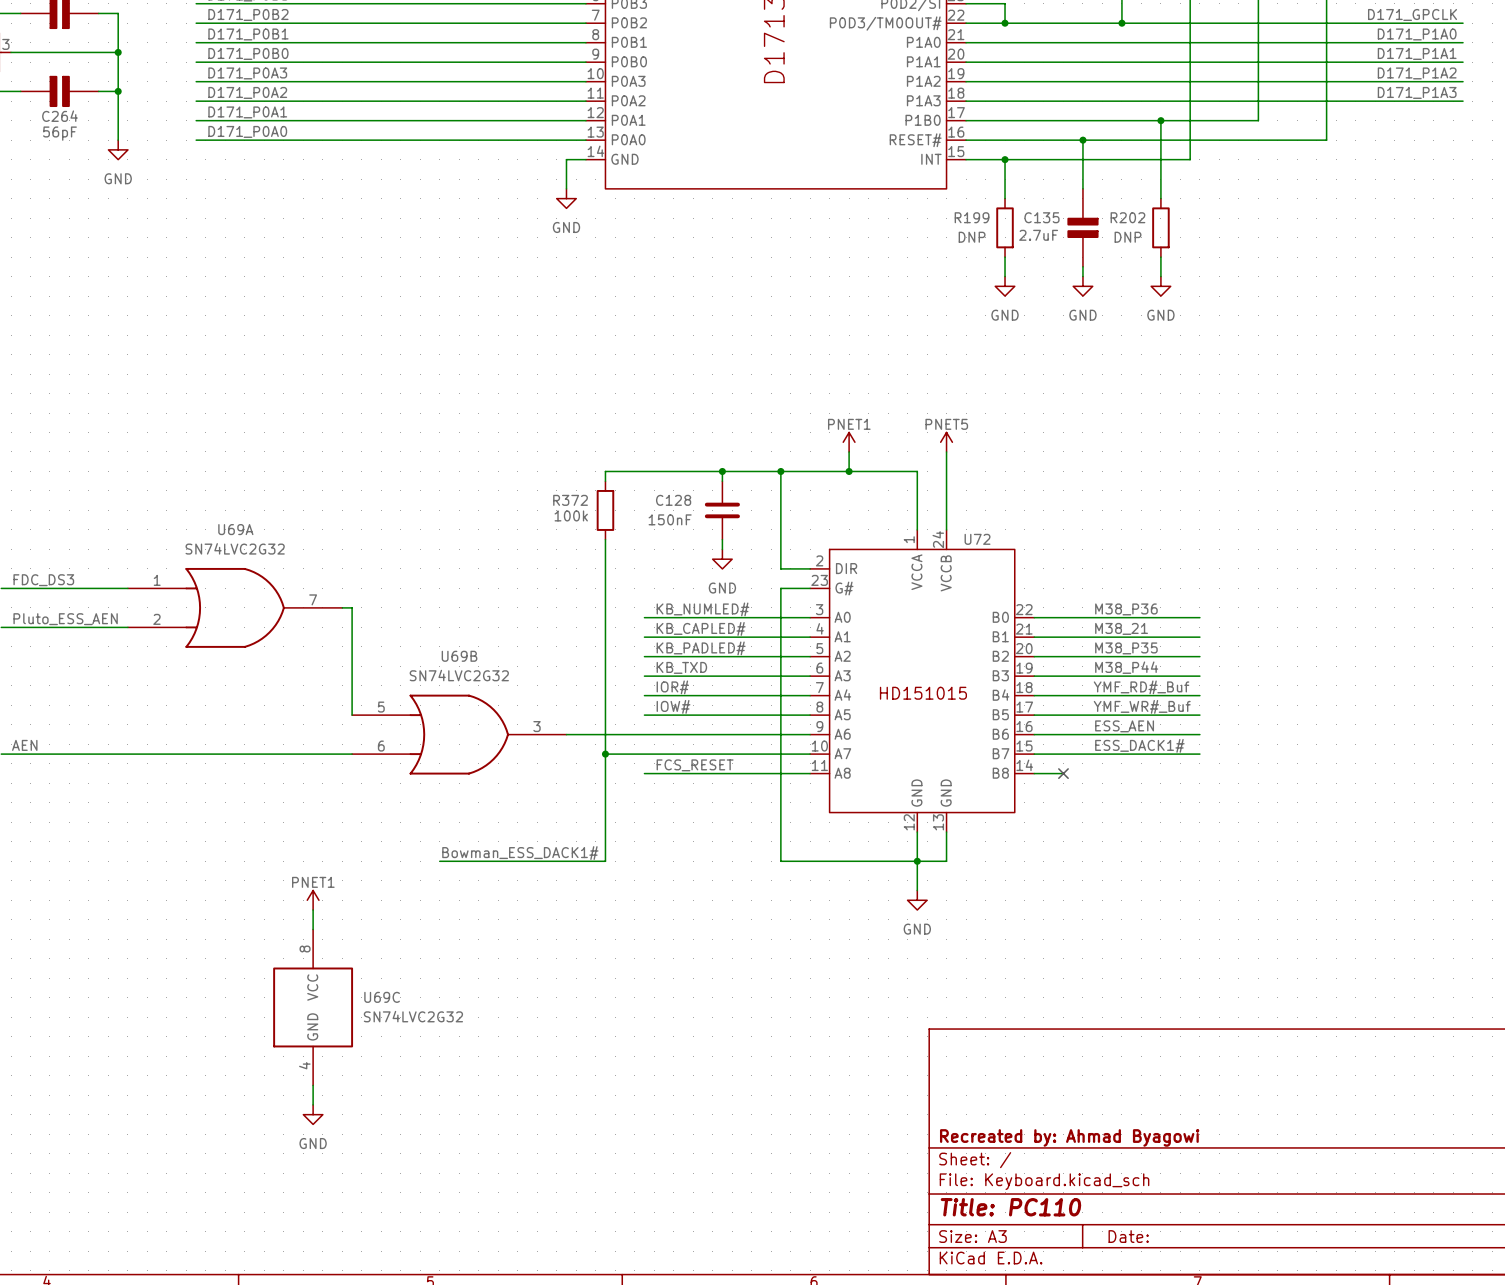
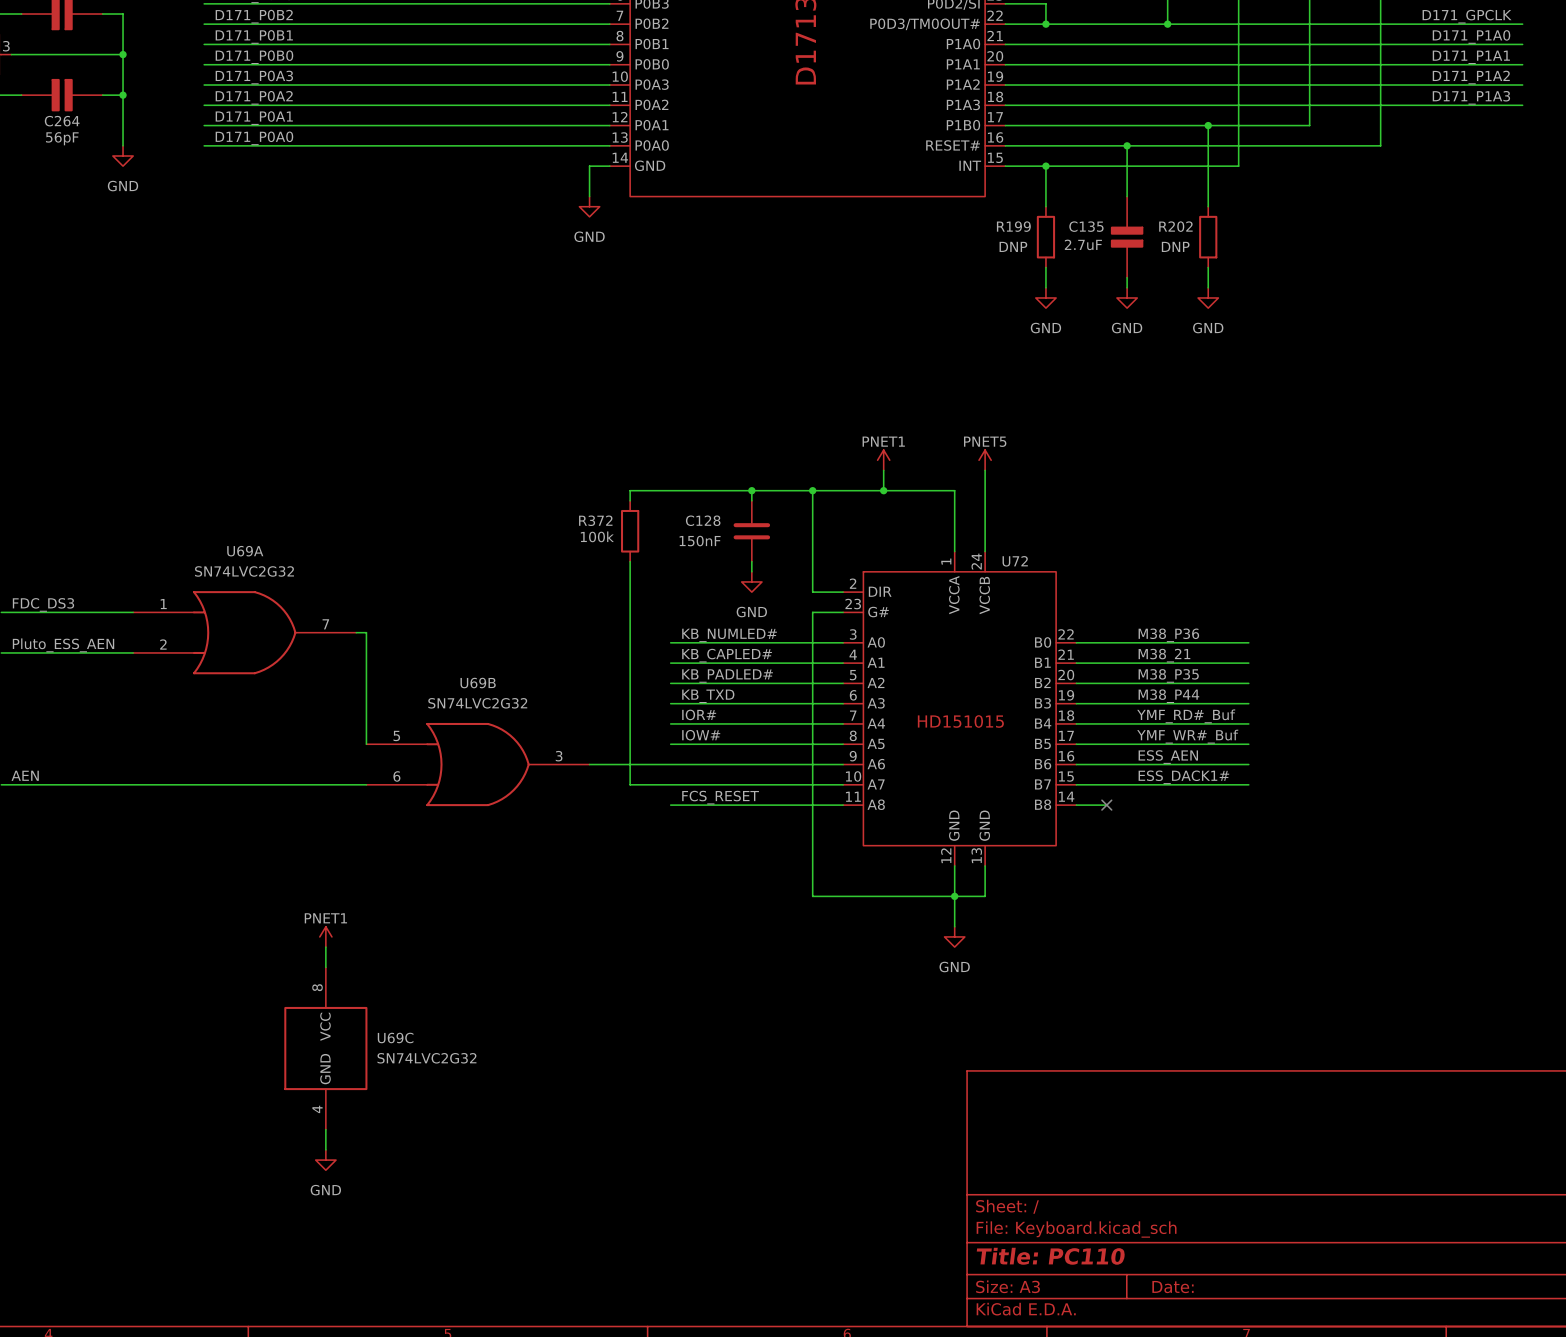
wire: (605, 754) (605, 861) (439, 861) -> none
junction: (605, 754) -> none
label: Bowman_ESS_DACK1# (520, 853) -> none
title block: Recreated by: Ahmad Byagowi (1069, 1137) -> none

